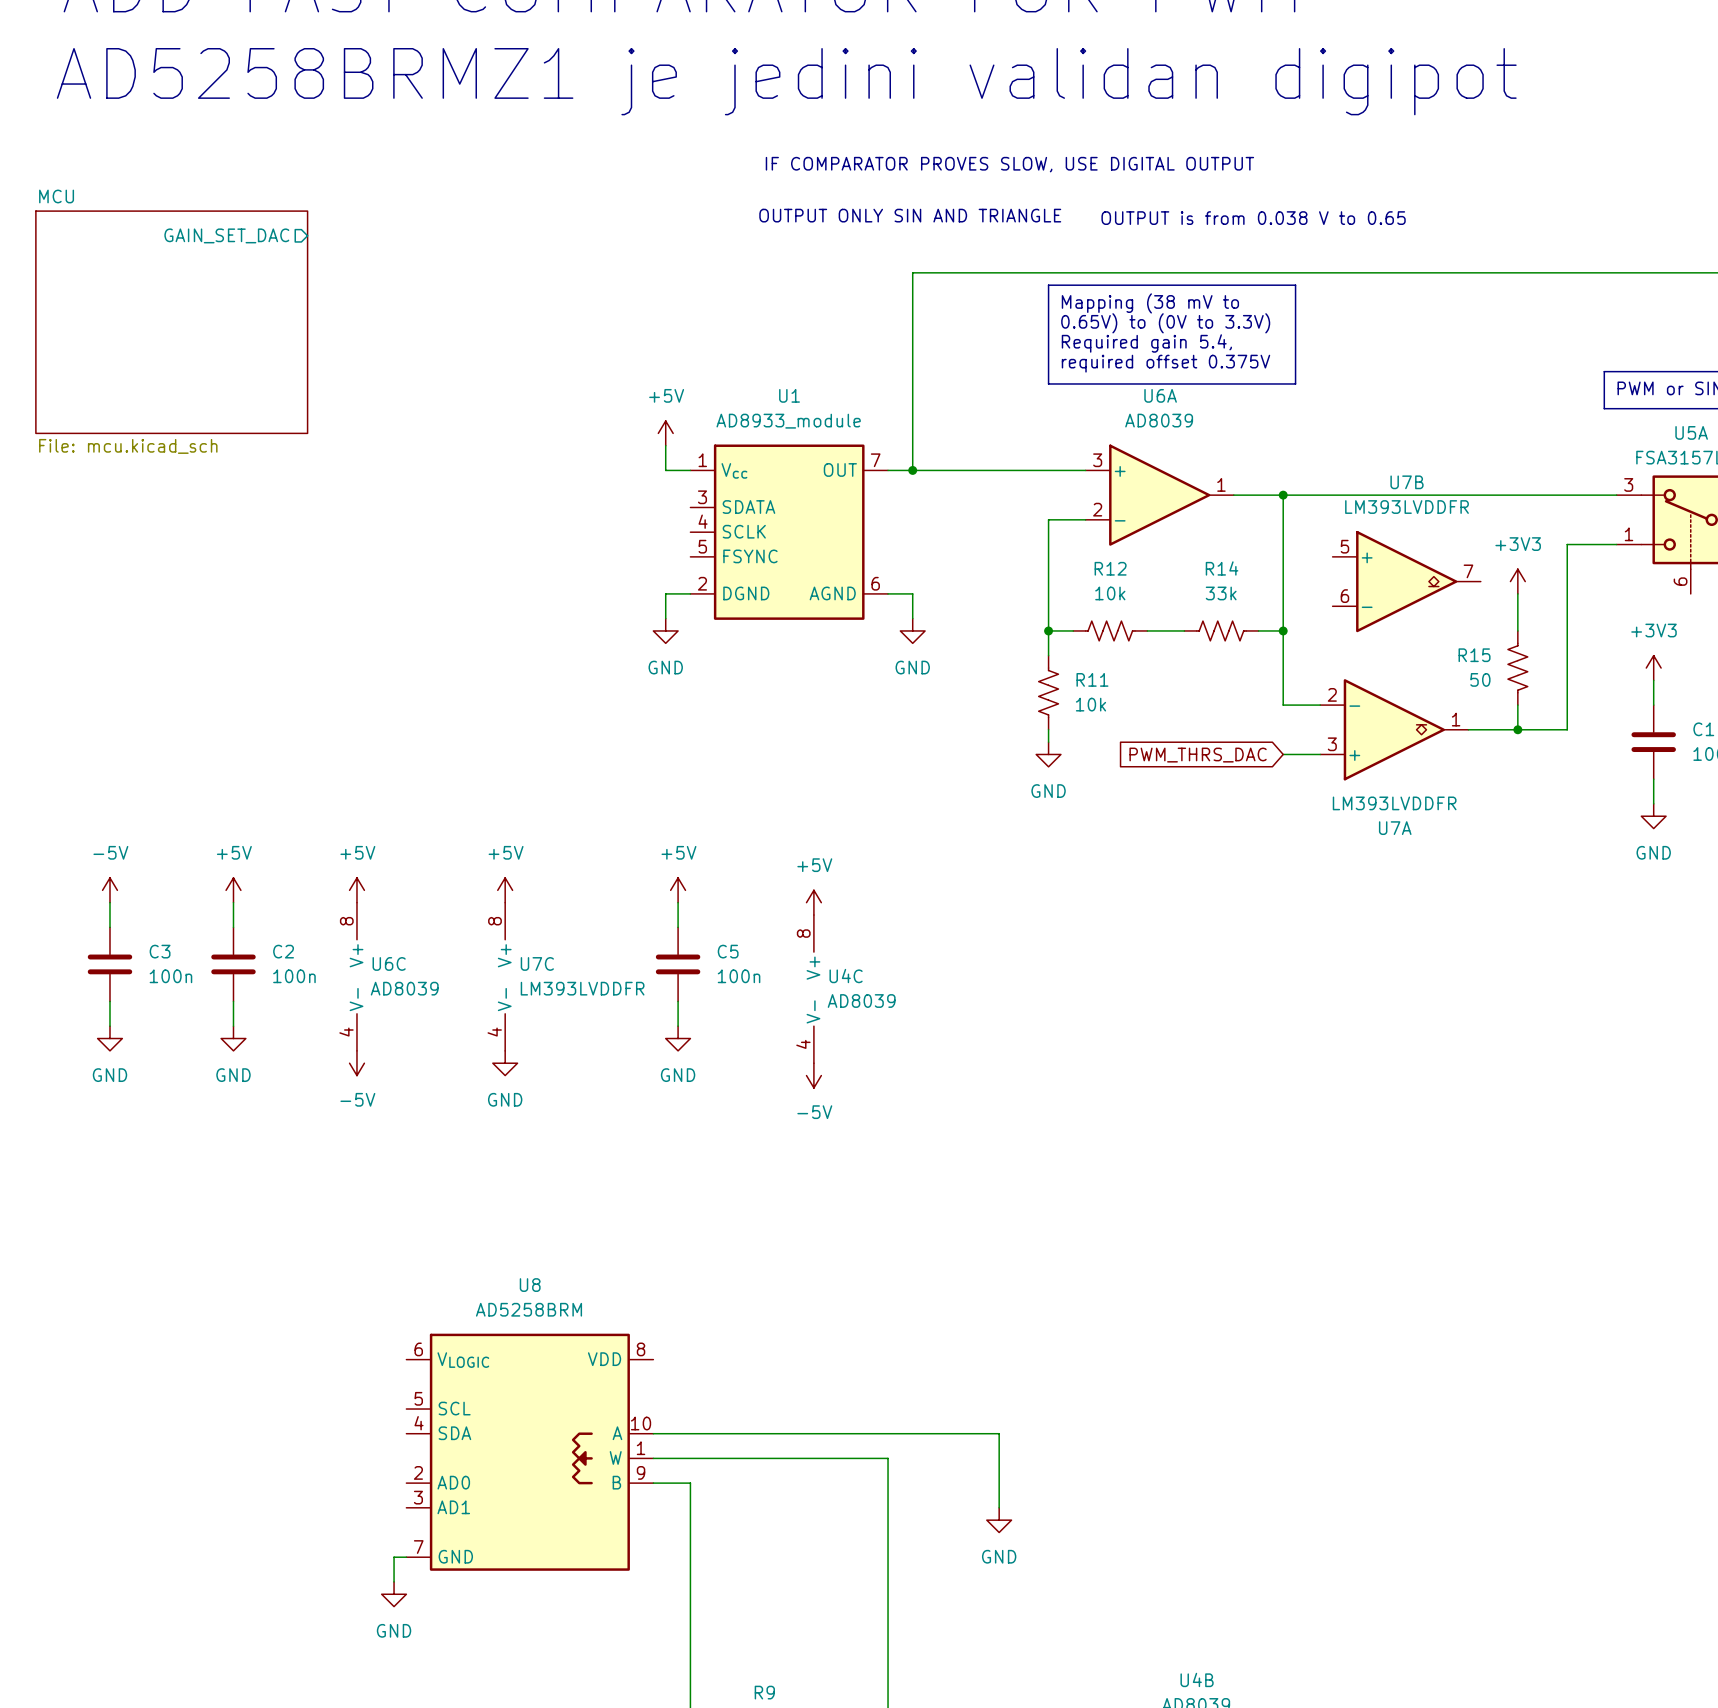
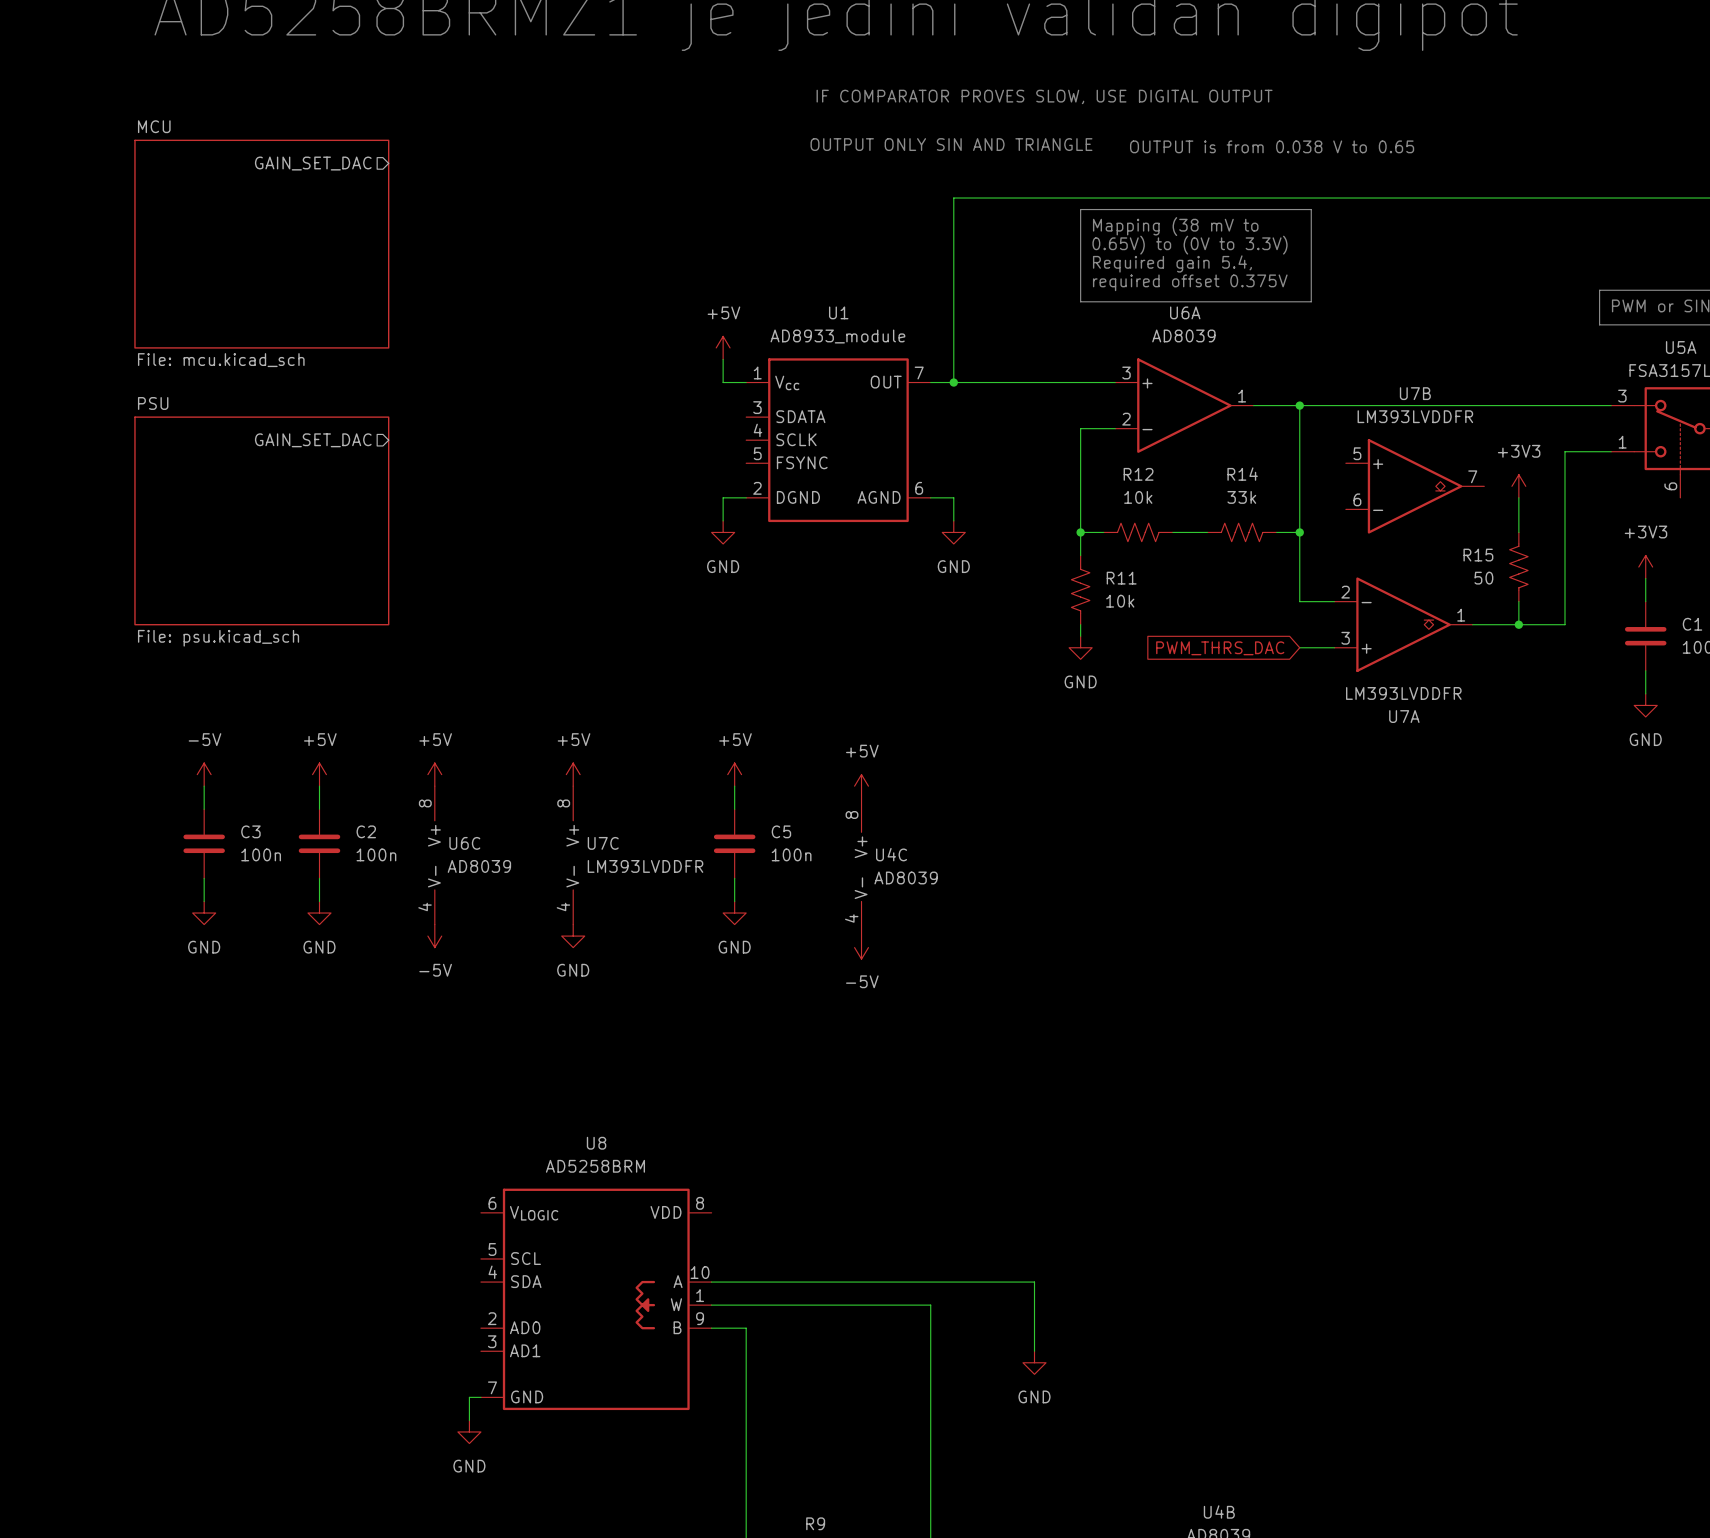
sheet pin: none -> GAIN_SET_DAC (313, 440)
sheet PSU: none -> File: psu.kicad_sch (261, 520)

